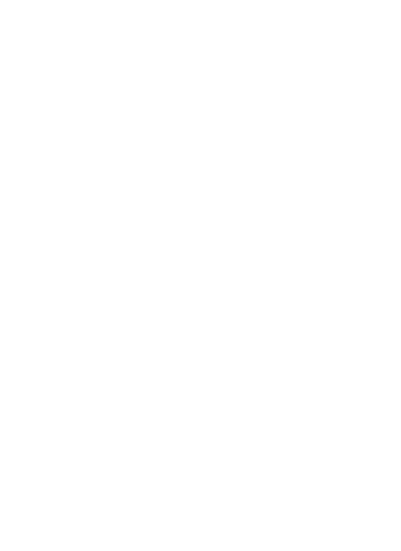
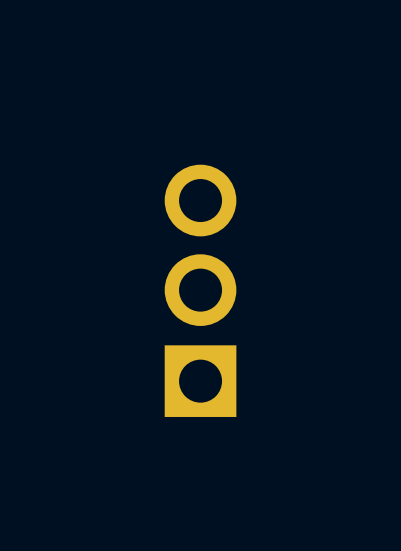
part: none -> (200, 290)

